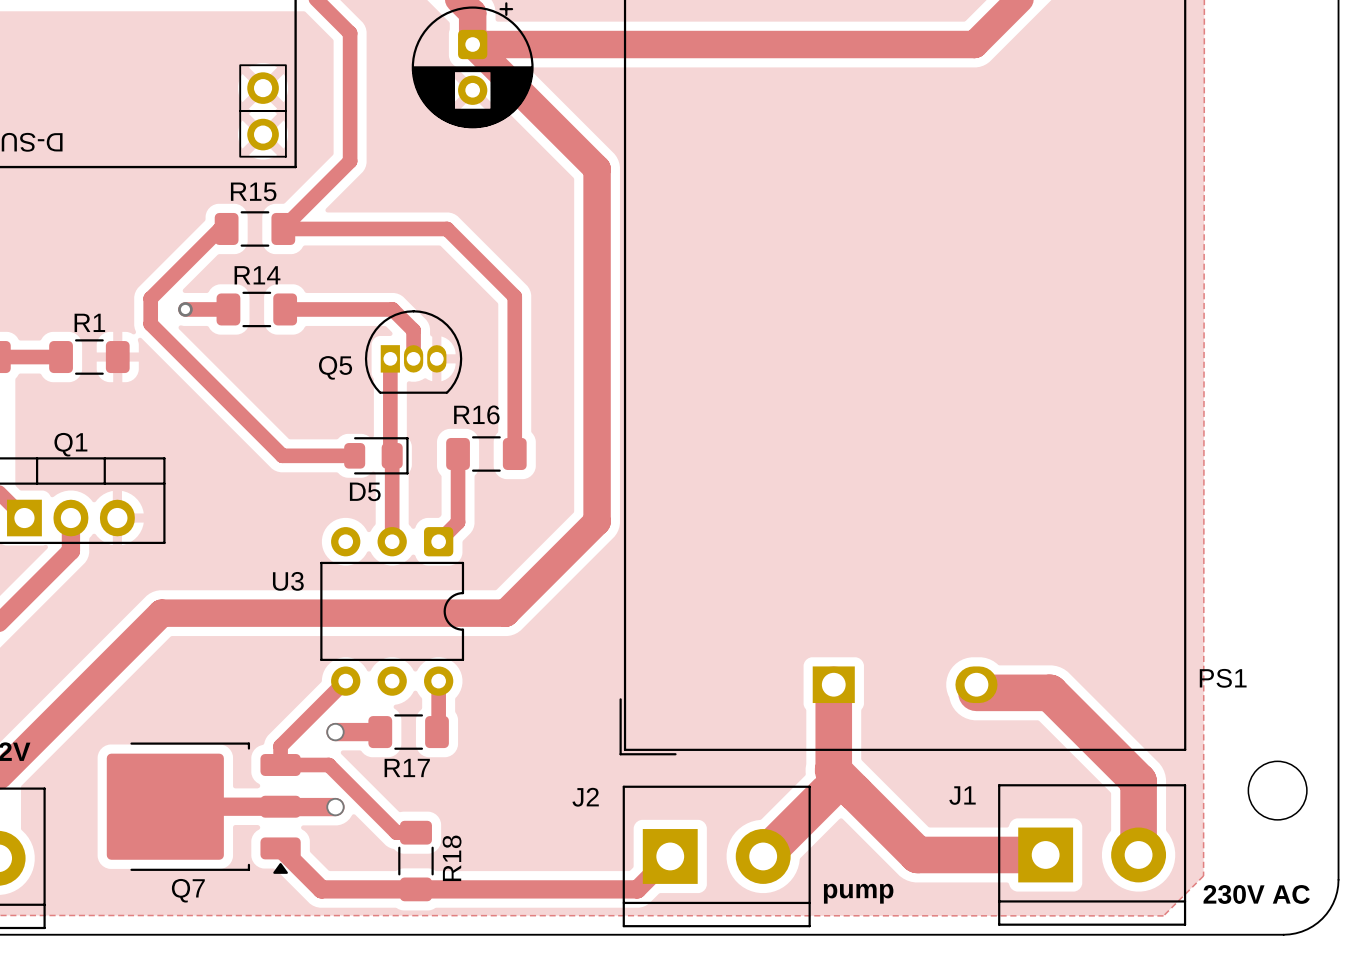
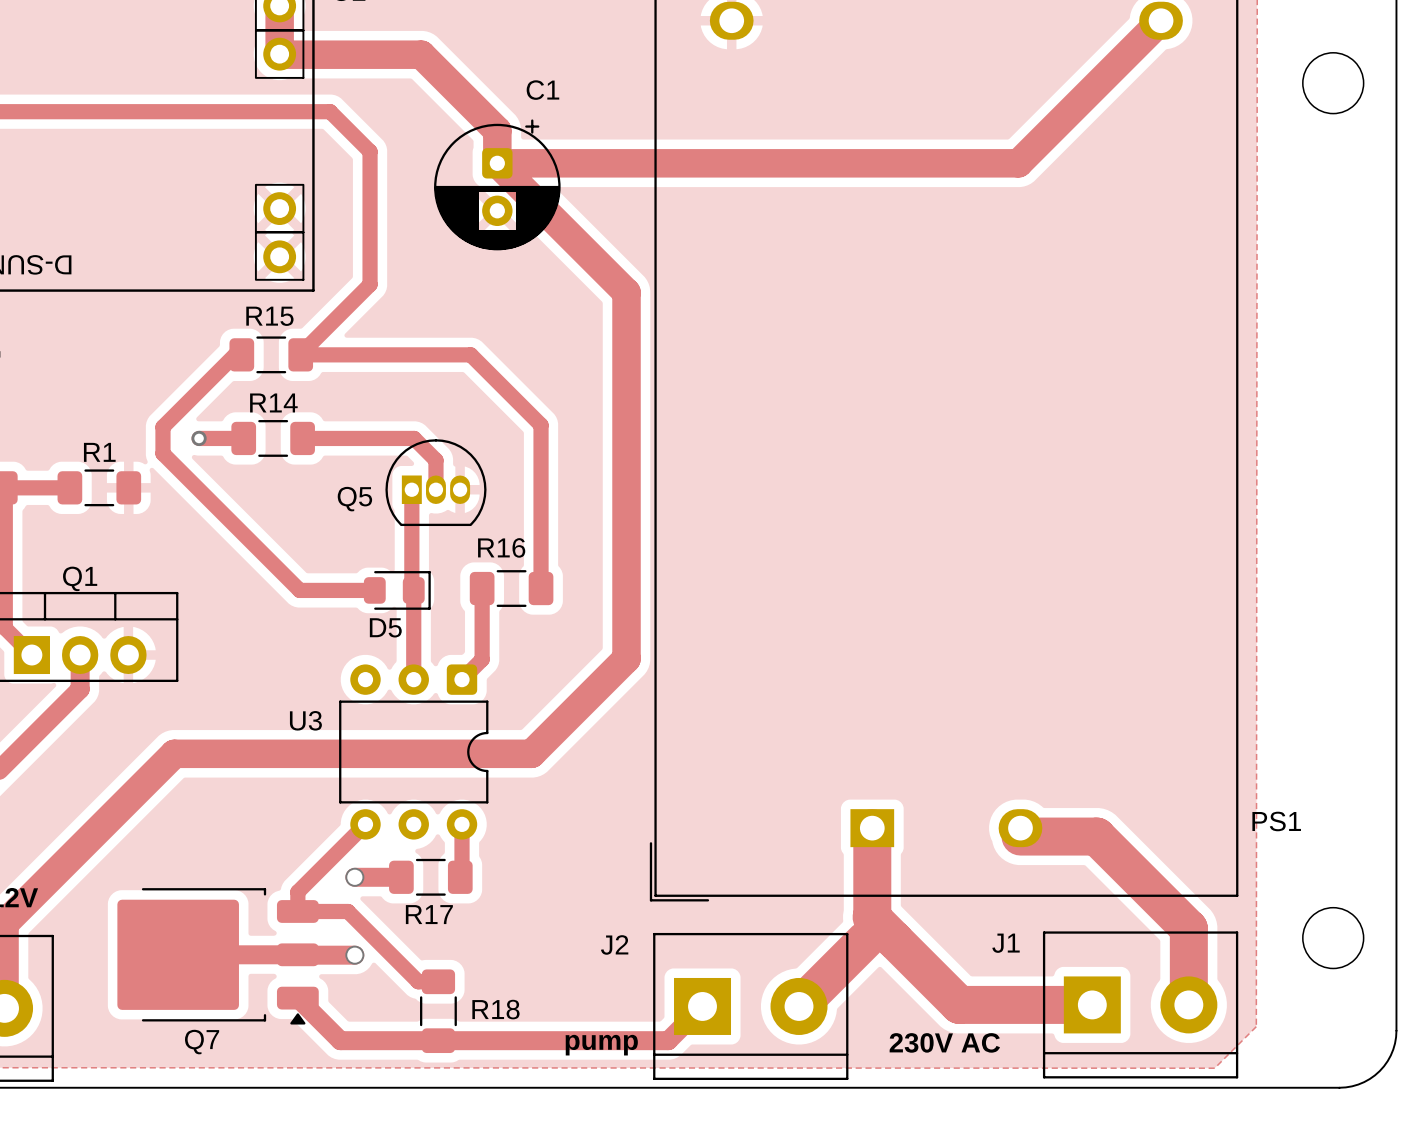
R18 name rotation: 0° (452, 858) -> 90° clockwise (495, 1009)
text position: pump (858, 893) -> pump (601, 1045)
text position: 230V AC (1256, 894) -> 230V AC (944, 1042)

